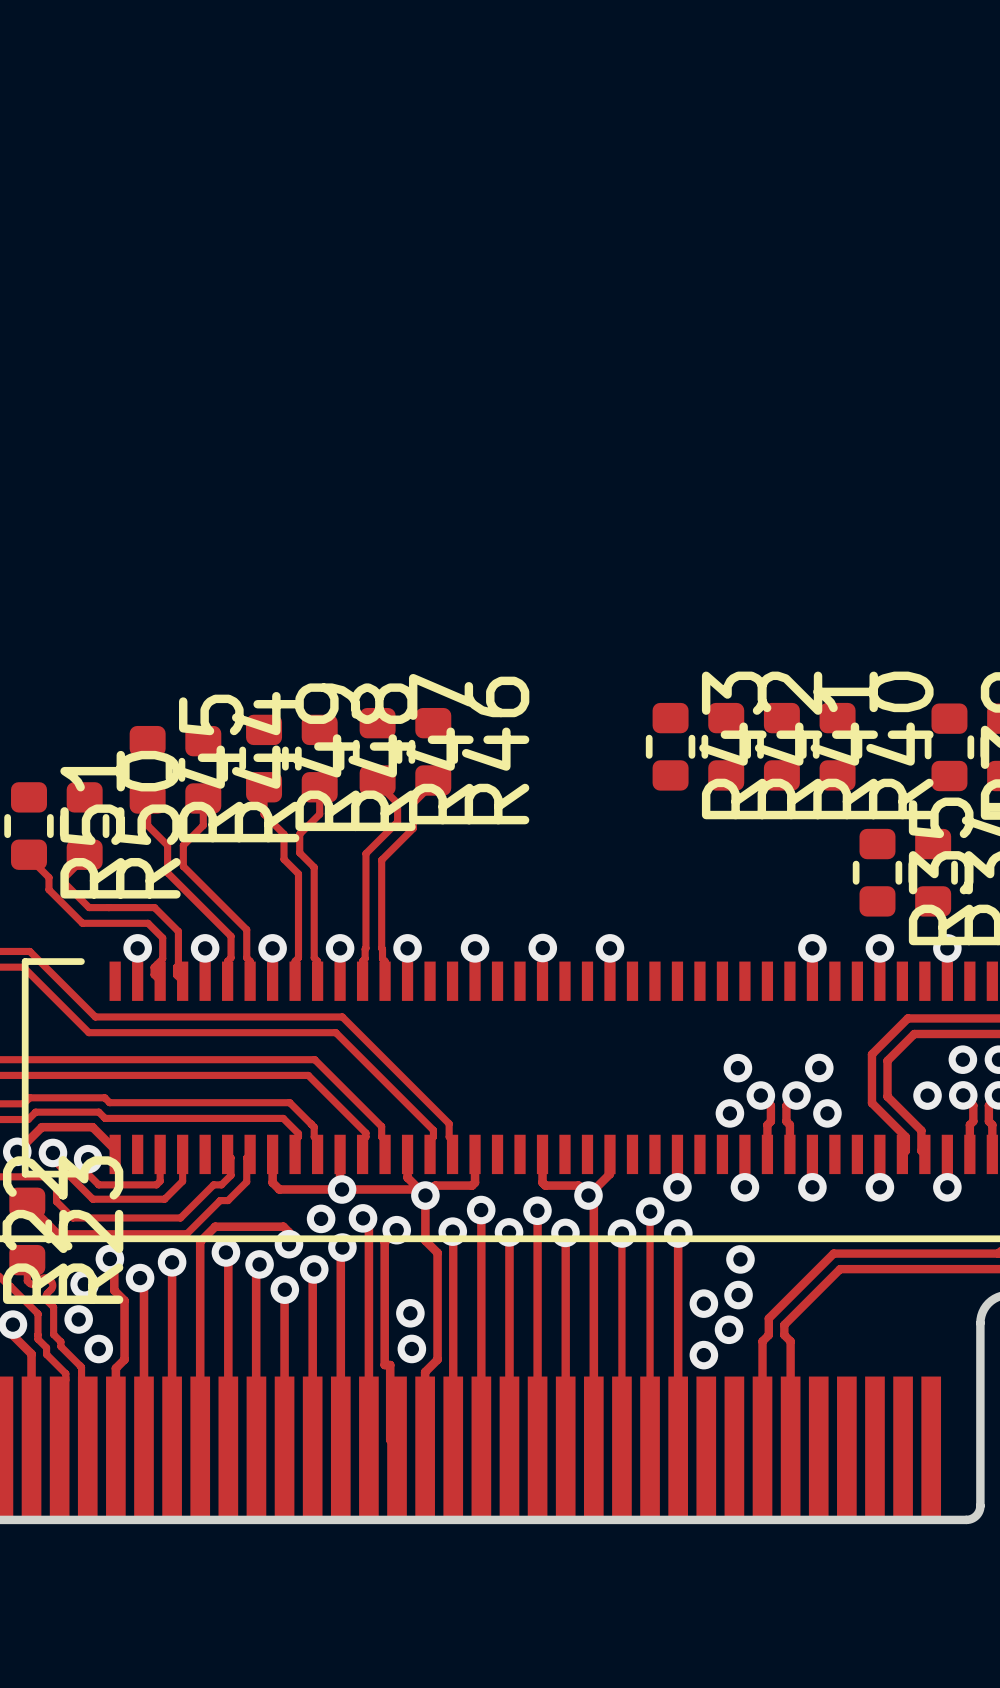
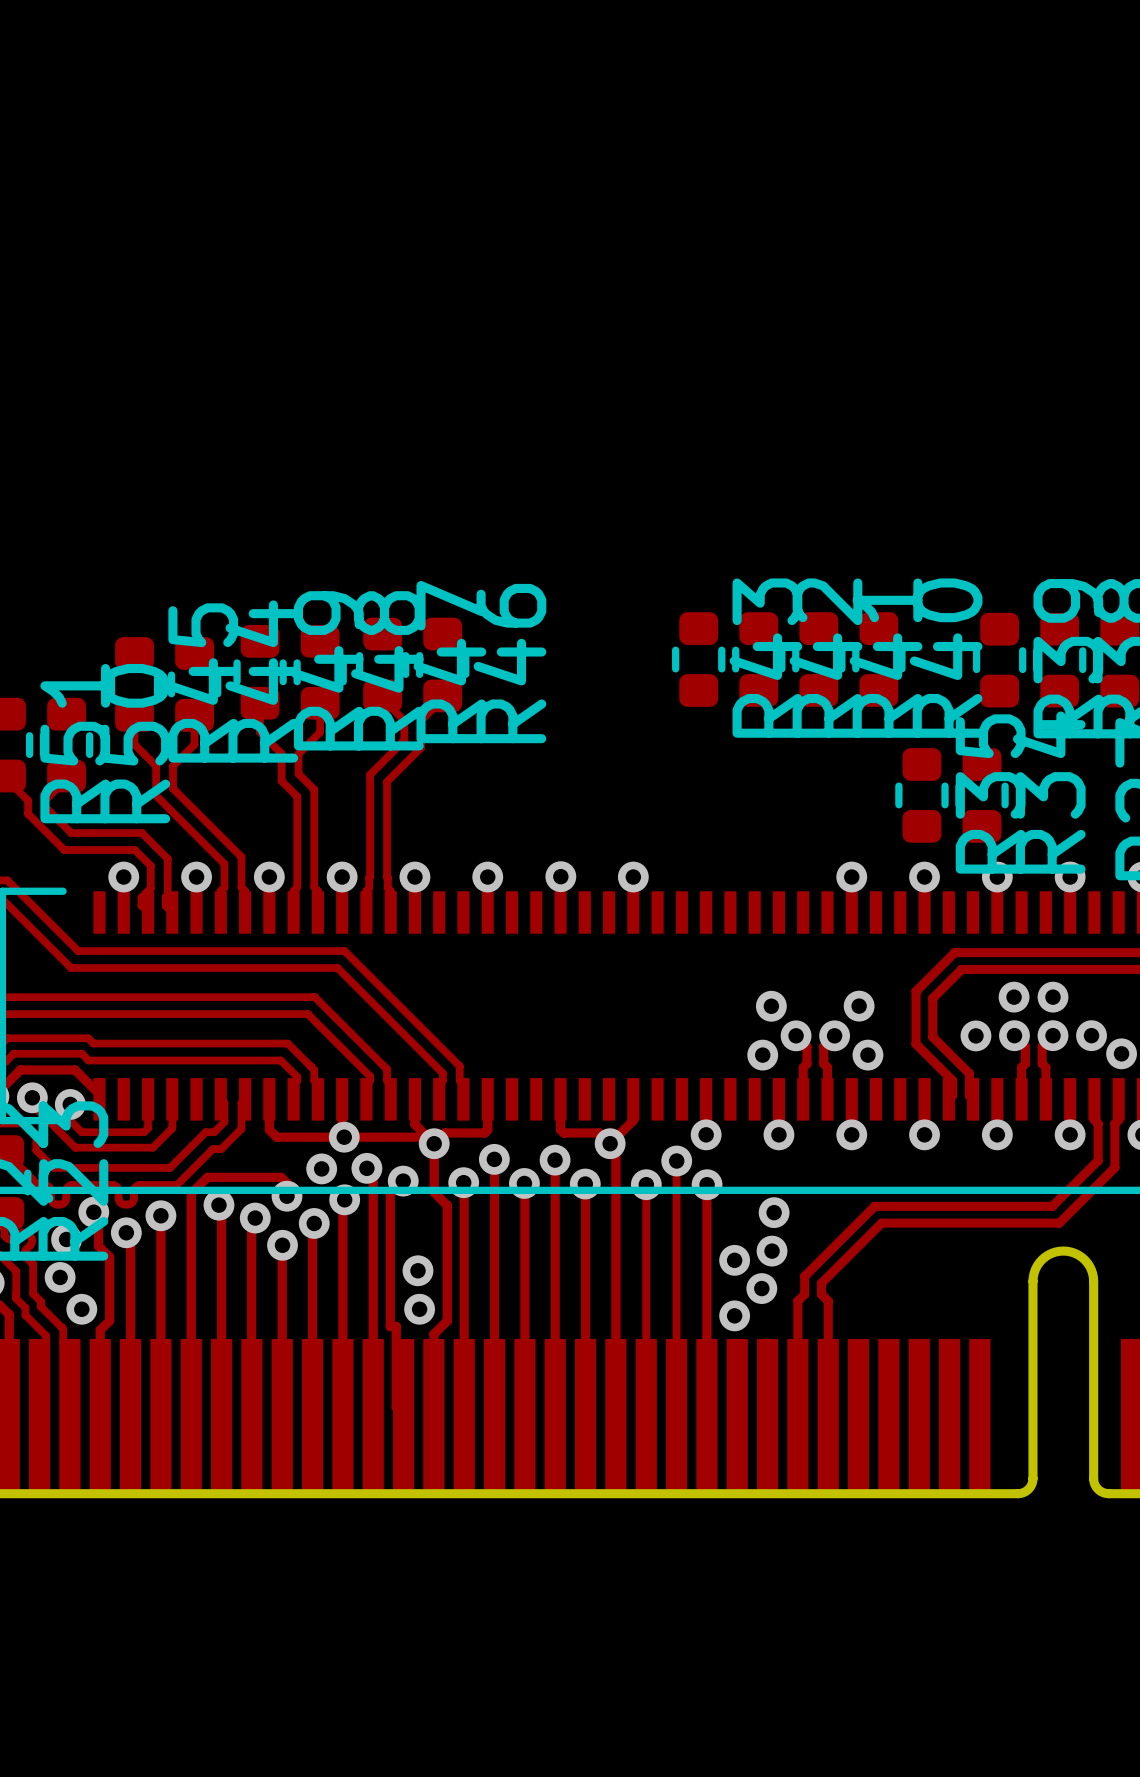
track: (64, 1233) (90, 1233) -> (44, 1184) (50, 1187) (51, 1200) (57, 1204) (65, 1202) (66, 1188) (72, 1184)
track: (127, 1233) (152, 1233) -> (112, 1184) (118, 1188) (119, 1201) (124, 1204) (132, 1202) (134, 1188) (140, 1184)

